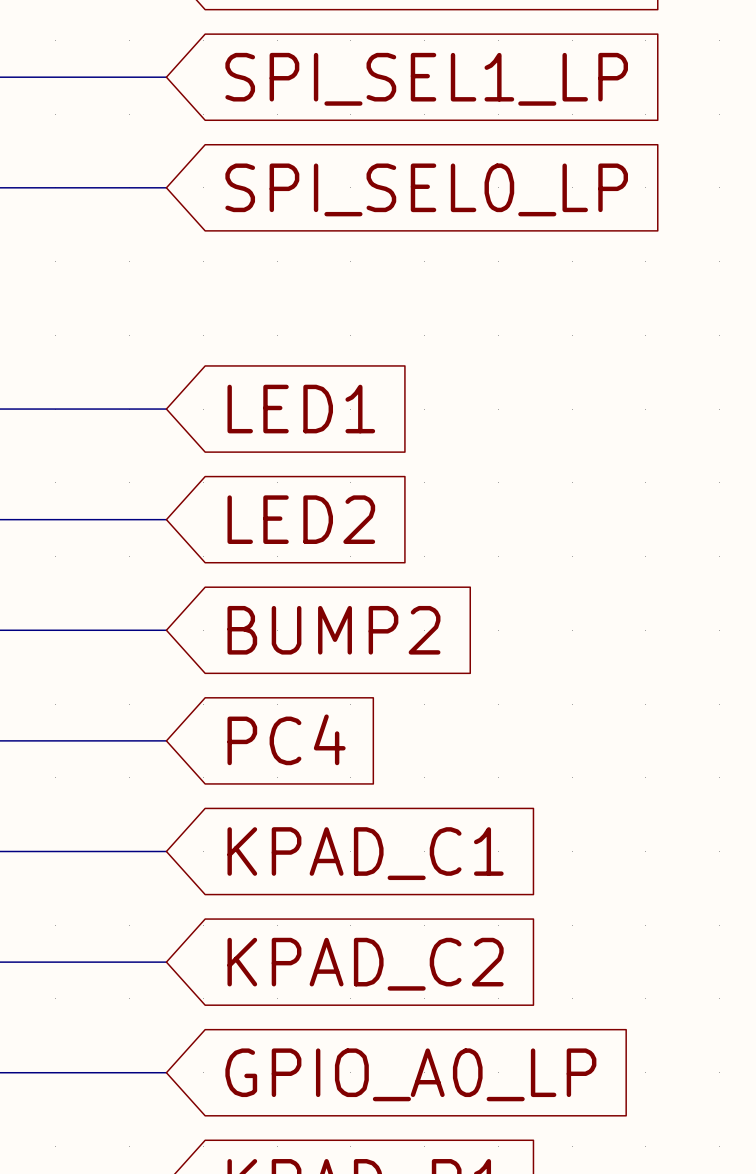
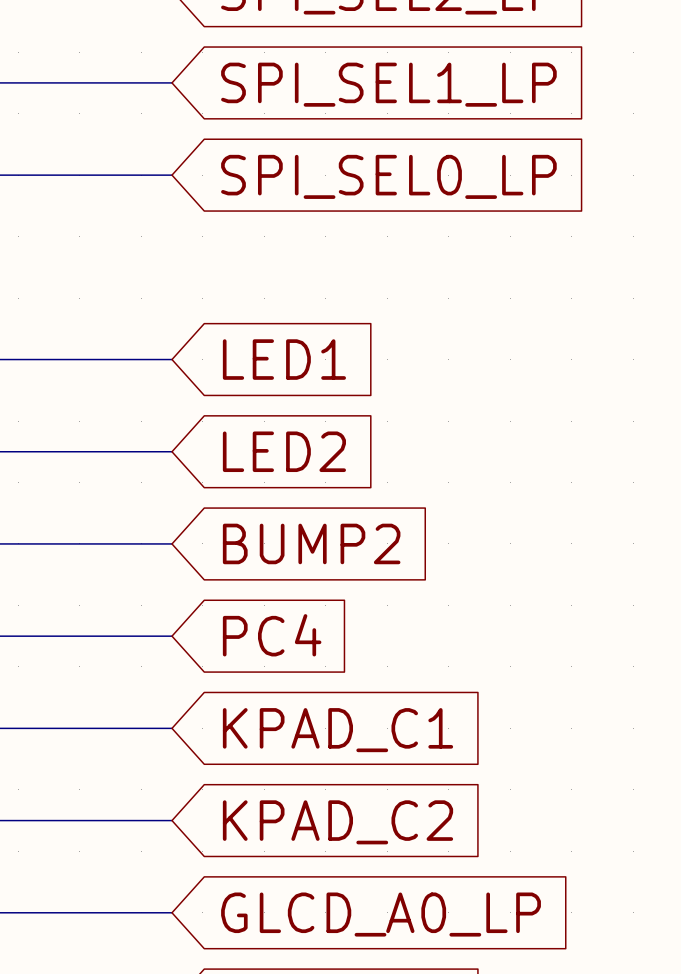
global label: GPIO_A0_LP (410, 1074) -> GLCD_A0_LP (381, 914)

